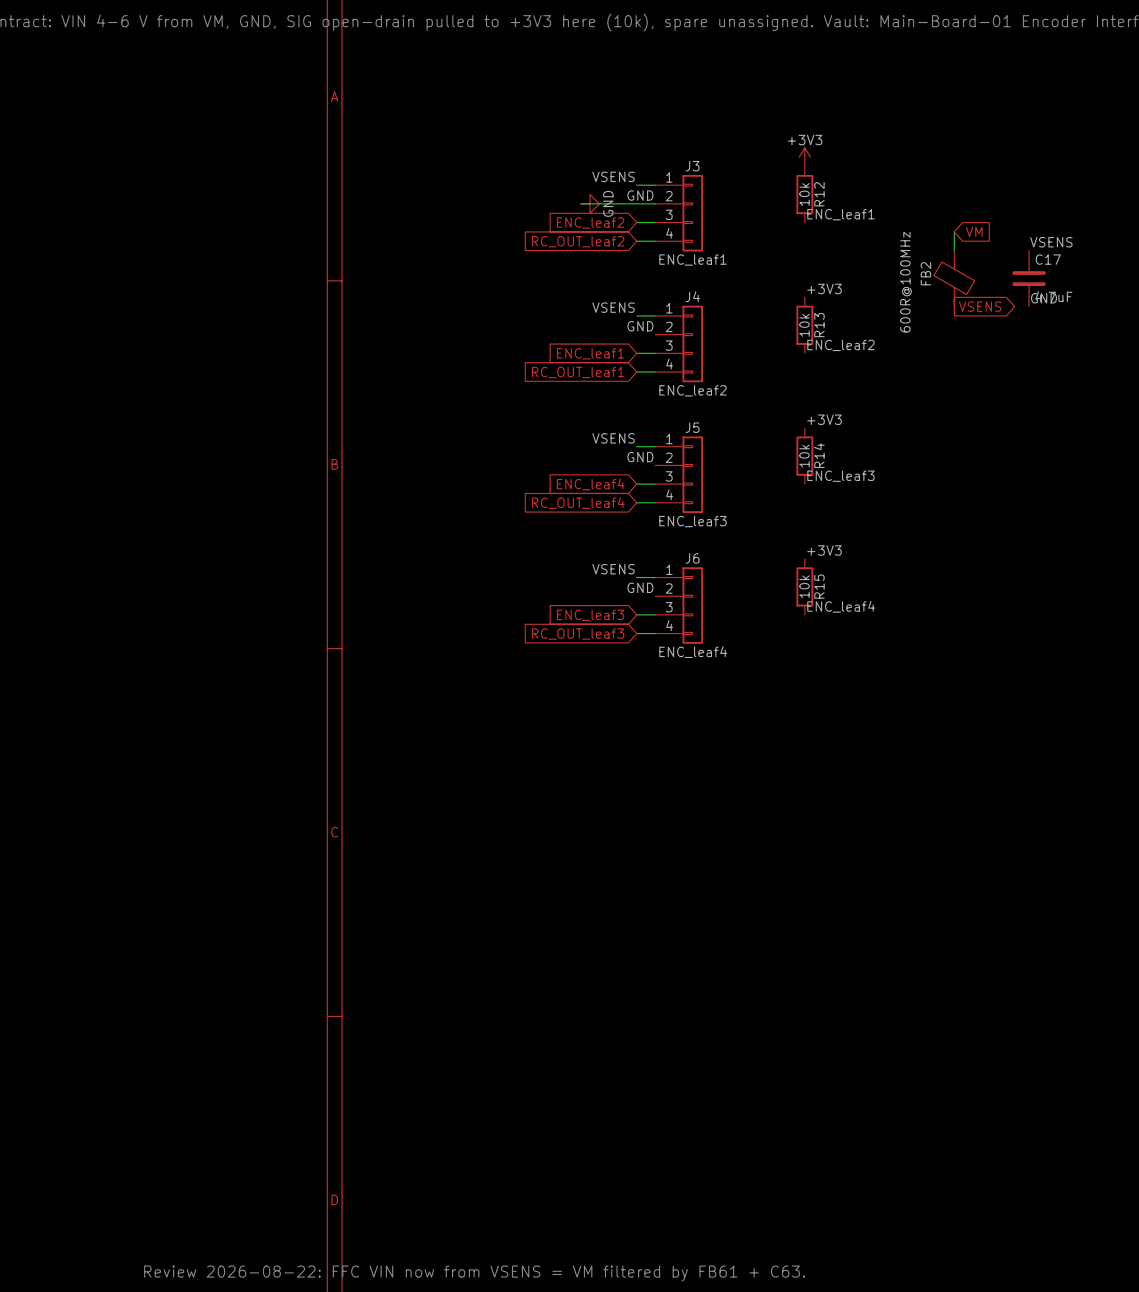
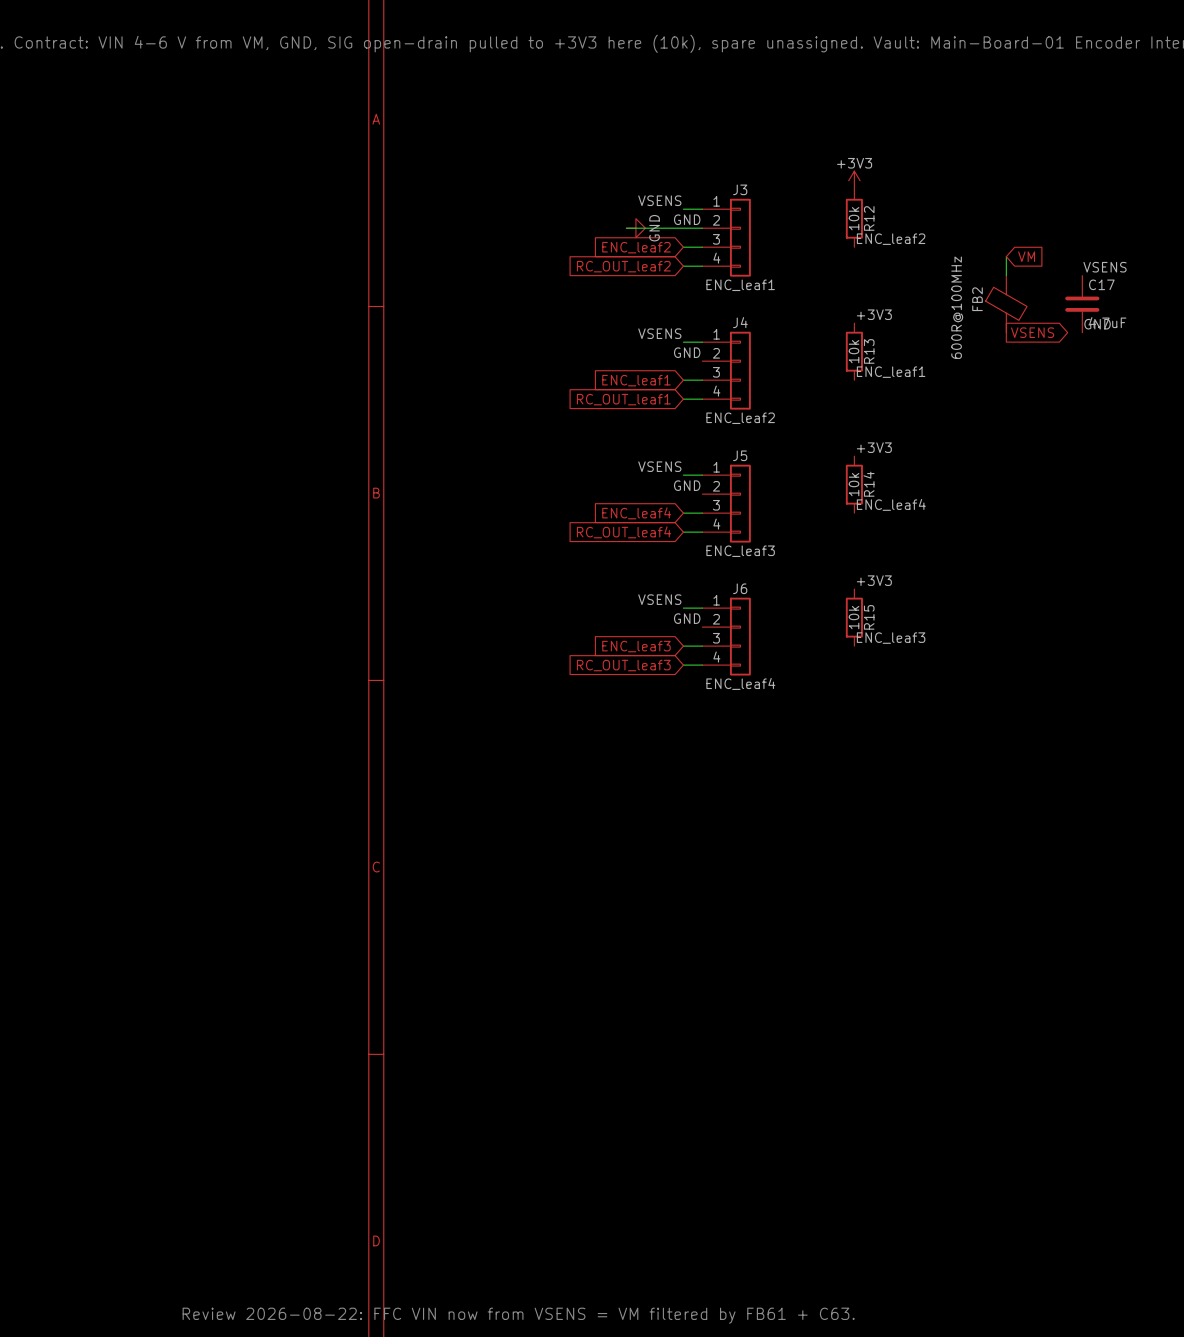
label: ENC_leaf1 (840, 214) -> ENC_leaf2 (891, 239)
label: ENC_leaf2 (840, 345) -> ENC_leaf1 (891, 372)
label: ENC_leaf3 (840, 476) -> ENC_leaf4 (891, 504)
label: ENC_leaf4 (841, 606) -> ENC_leaf3 (891, 638)

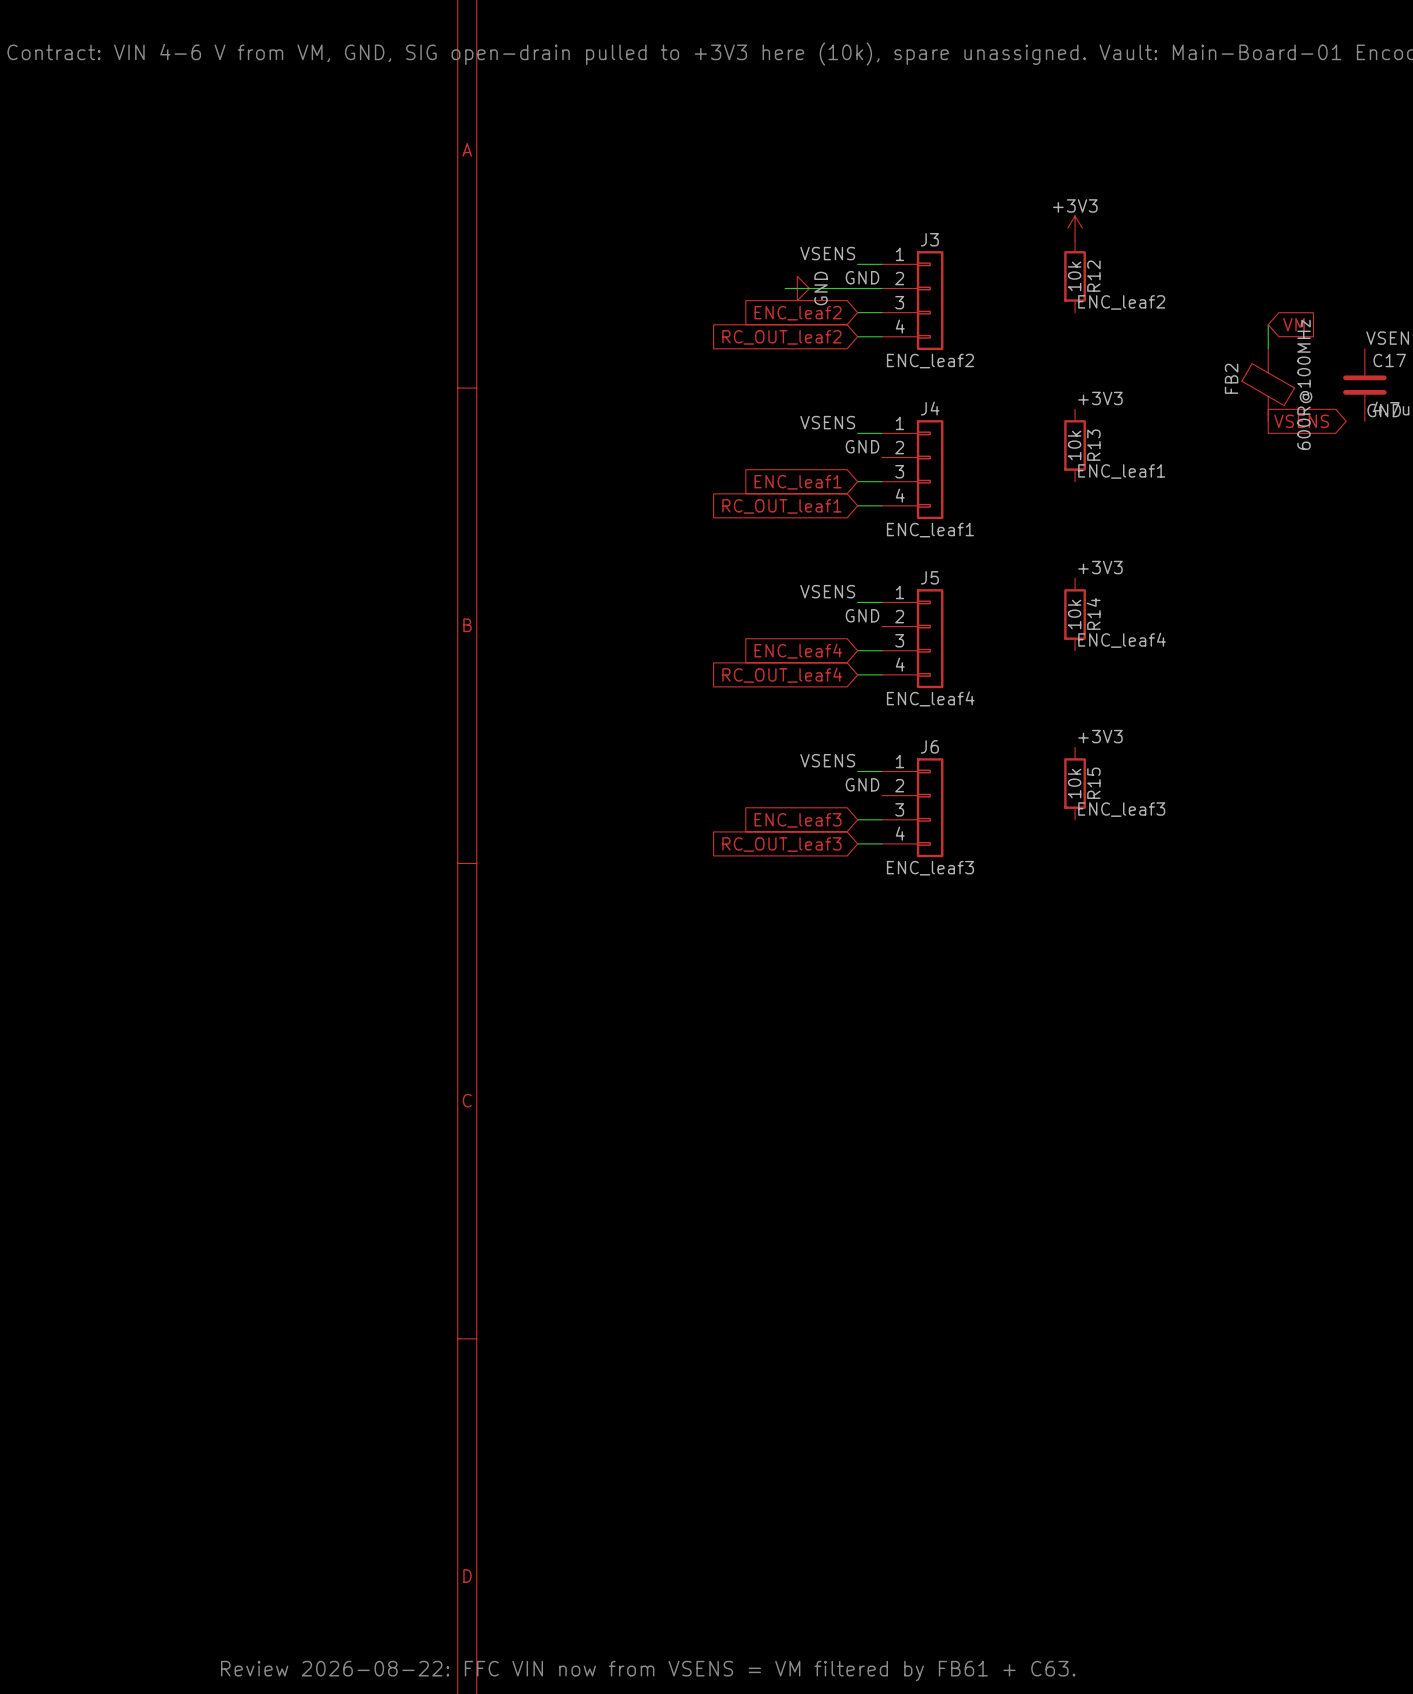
J3 value: ENC_leaf1 (740, 285) -> ENC_leaf2 (930, 361)
FB2 value position: 600R@100MHz (957, 307) -> 600R@100MHz (1304, 384)
J4 value: ENC_leaf2 (740, 418) -> ENC_leaf1 (930, 530)
J5 value: ENC_leaf3 (740, 551) -> ENC_leaf4 (930, 698)
J6 value: ENC_leaf4 (740, 683) -> ENC_leaf3 (930, 868)

